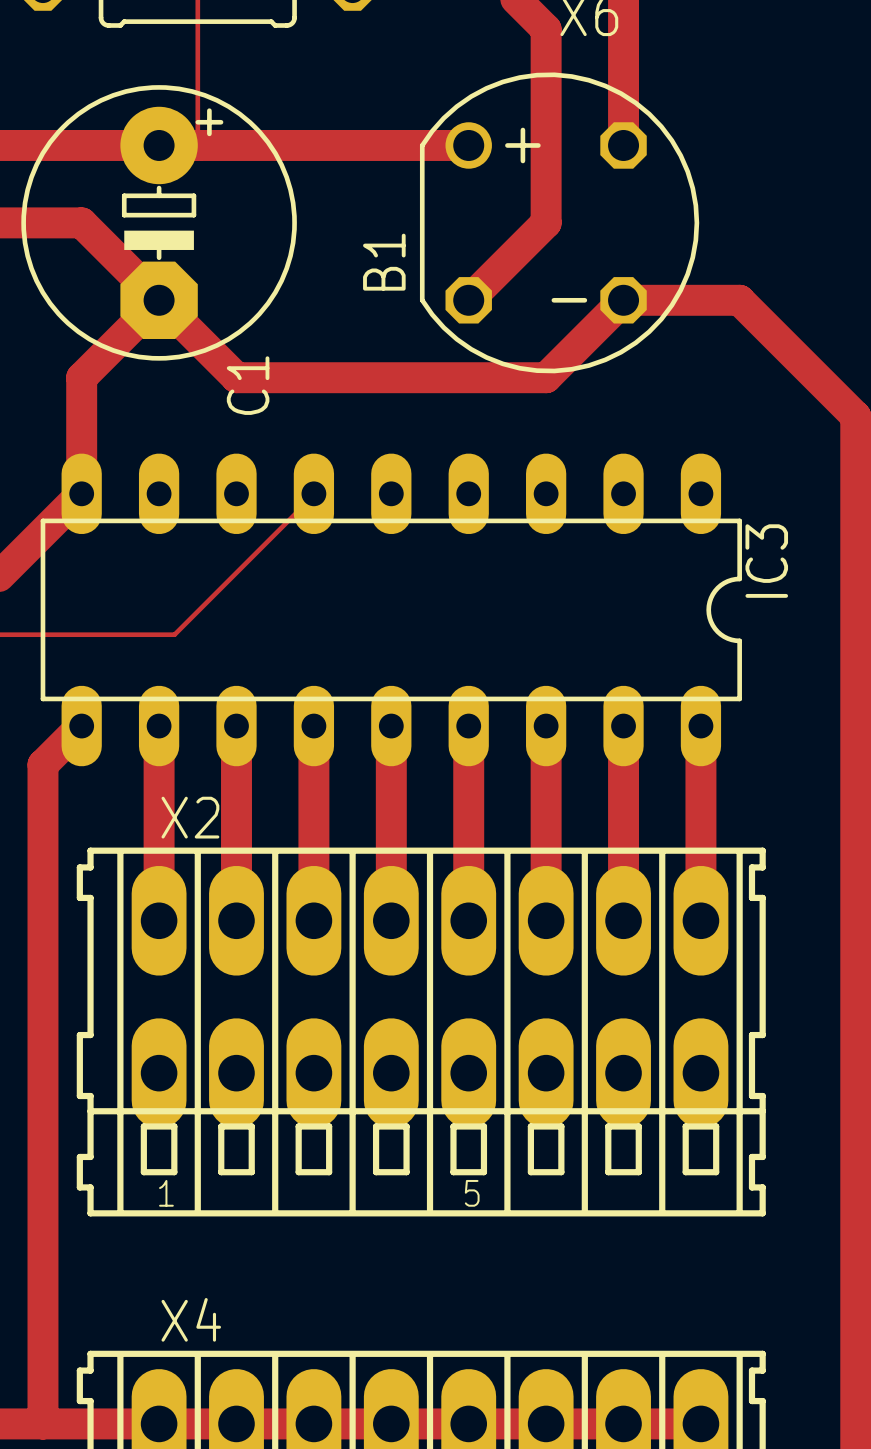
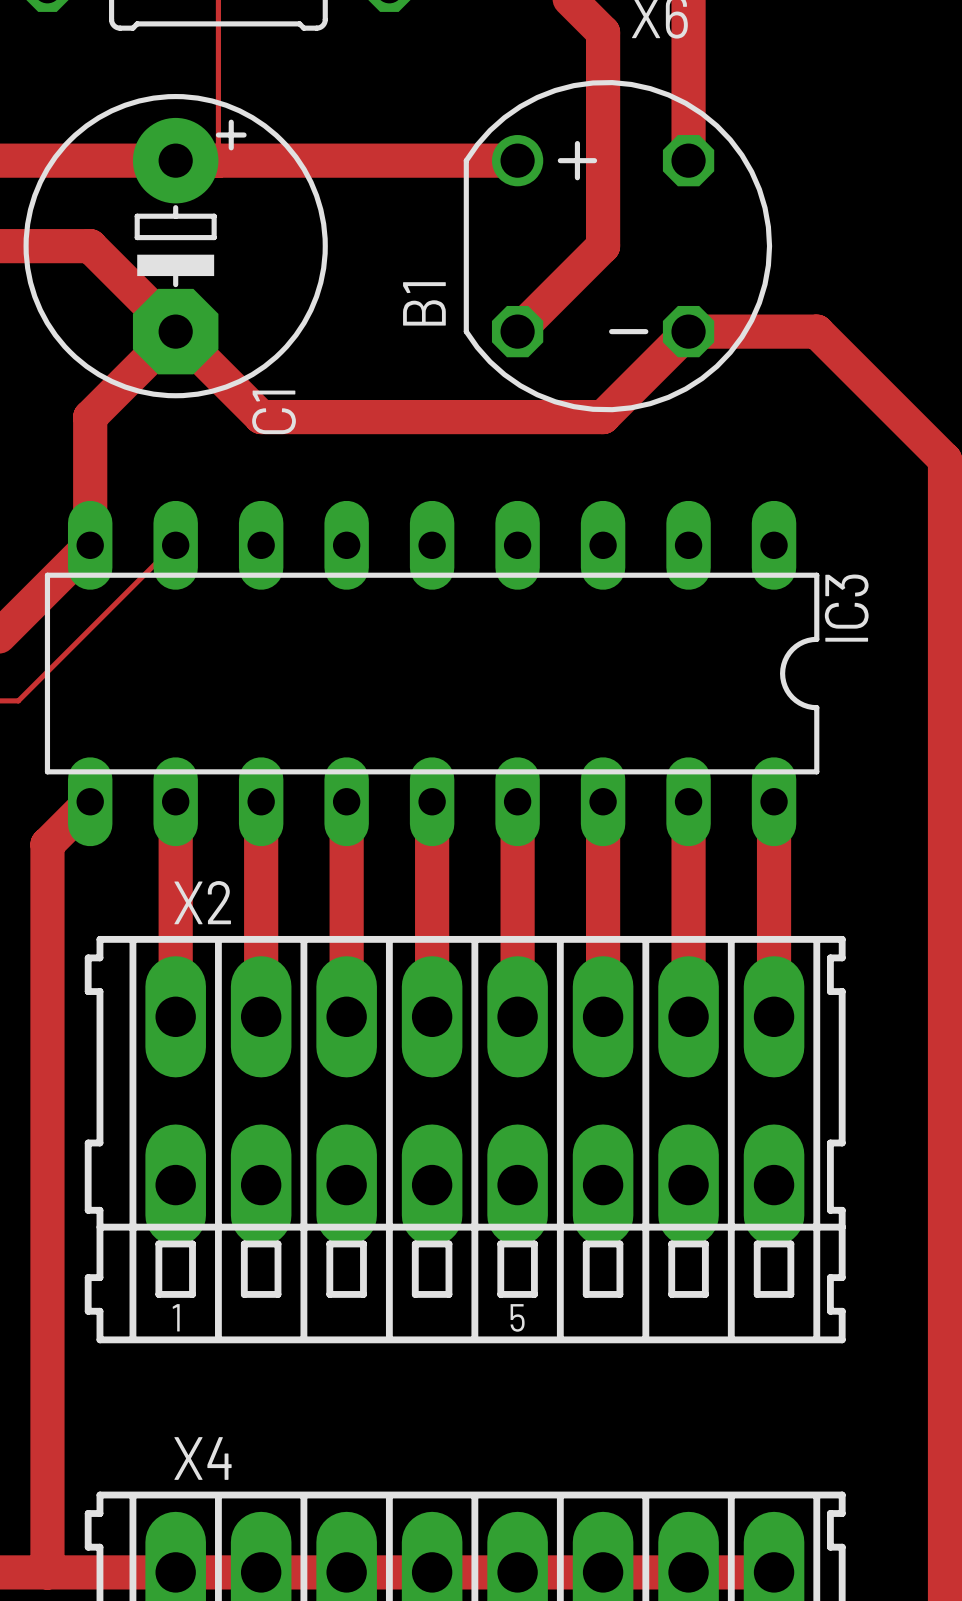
track: (313, 493) (174, 634) (16, 634) -> (175, 545) (18, 700)

